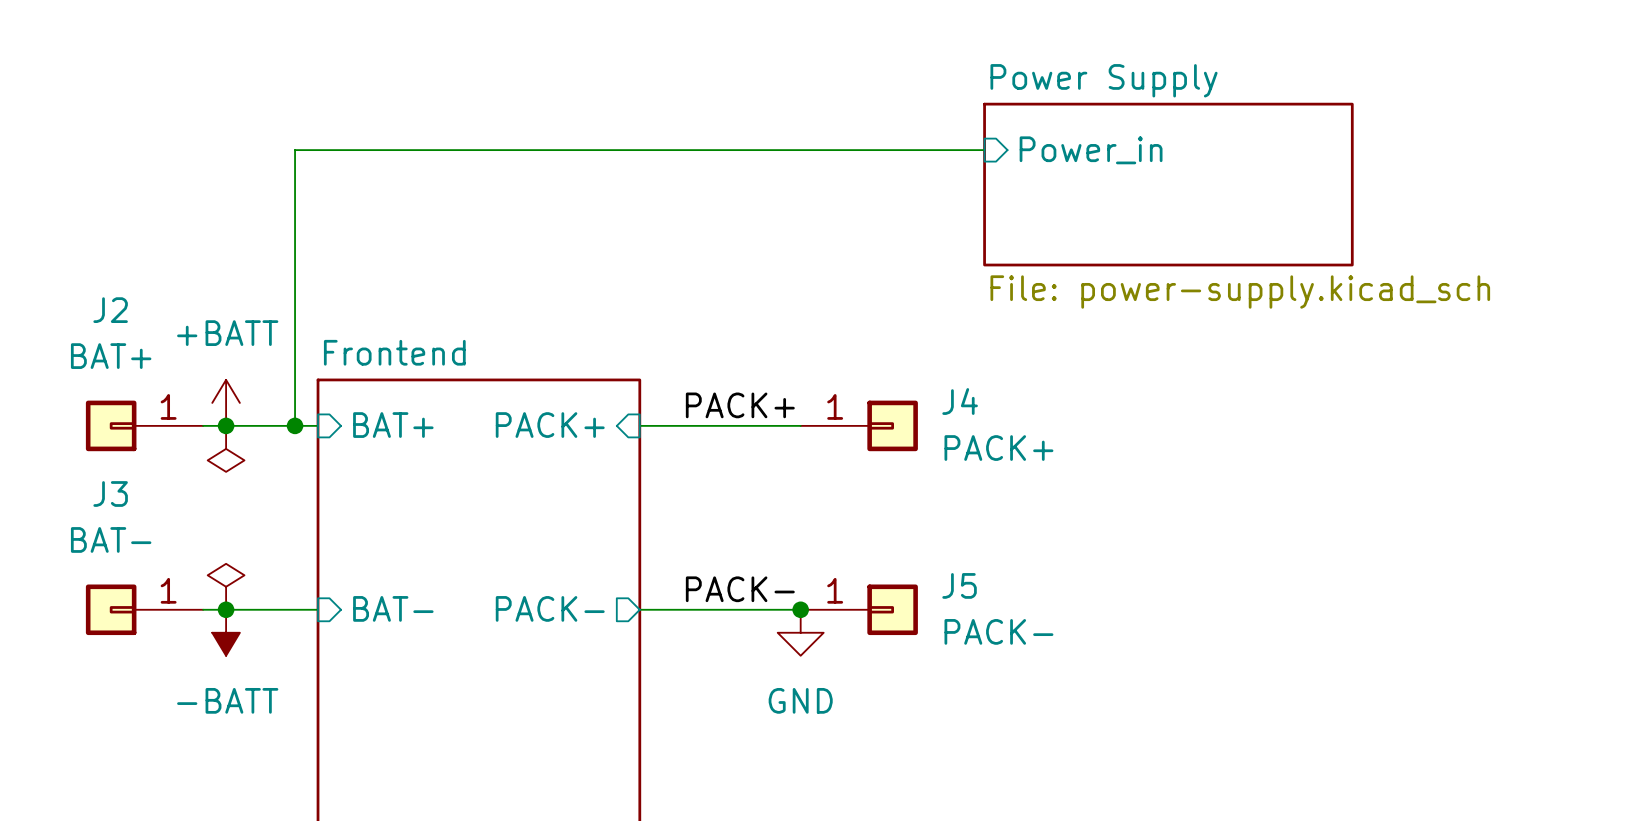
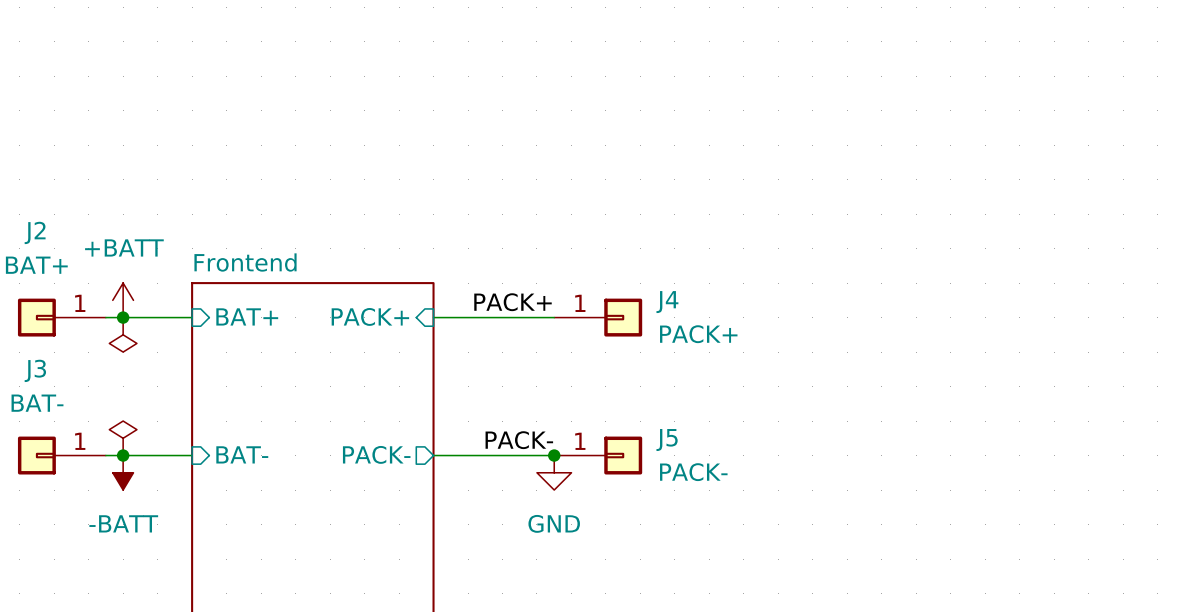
wire: (984, 150) (295, 150) (295, 425) -> none
sheet pin: Power_in (1091, 150) -> none
sheet Power Supply: File: power-supply.kicad_sch (1168, 184) -> none
junction: (295, 425) -> none

